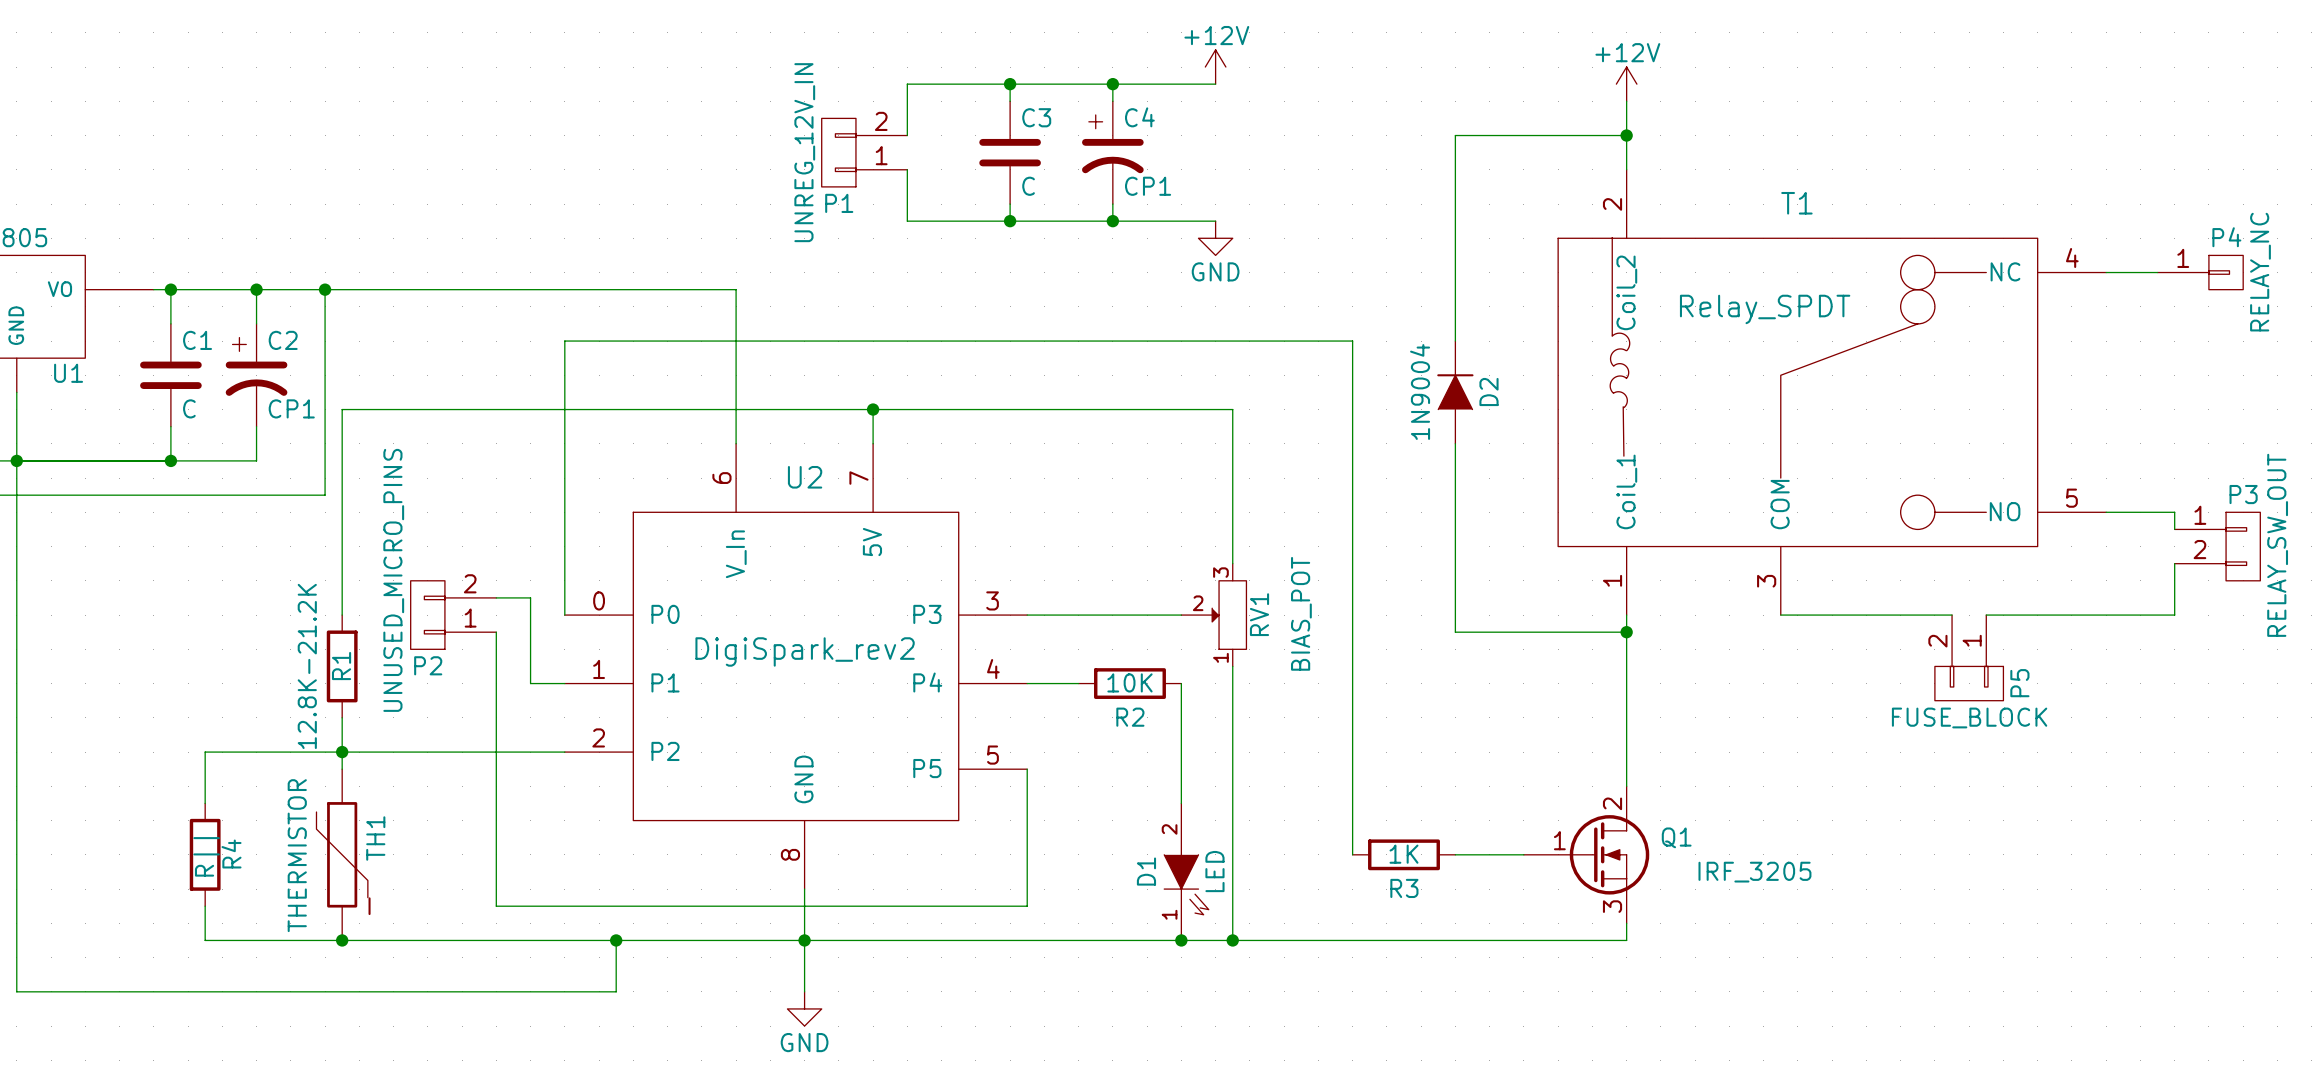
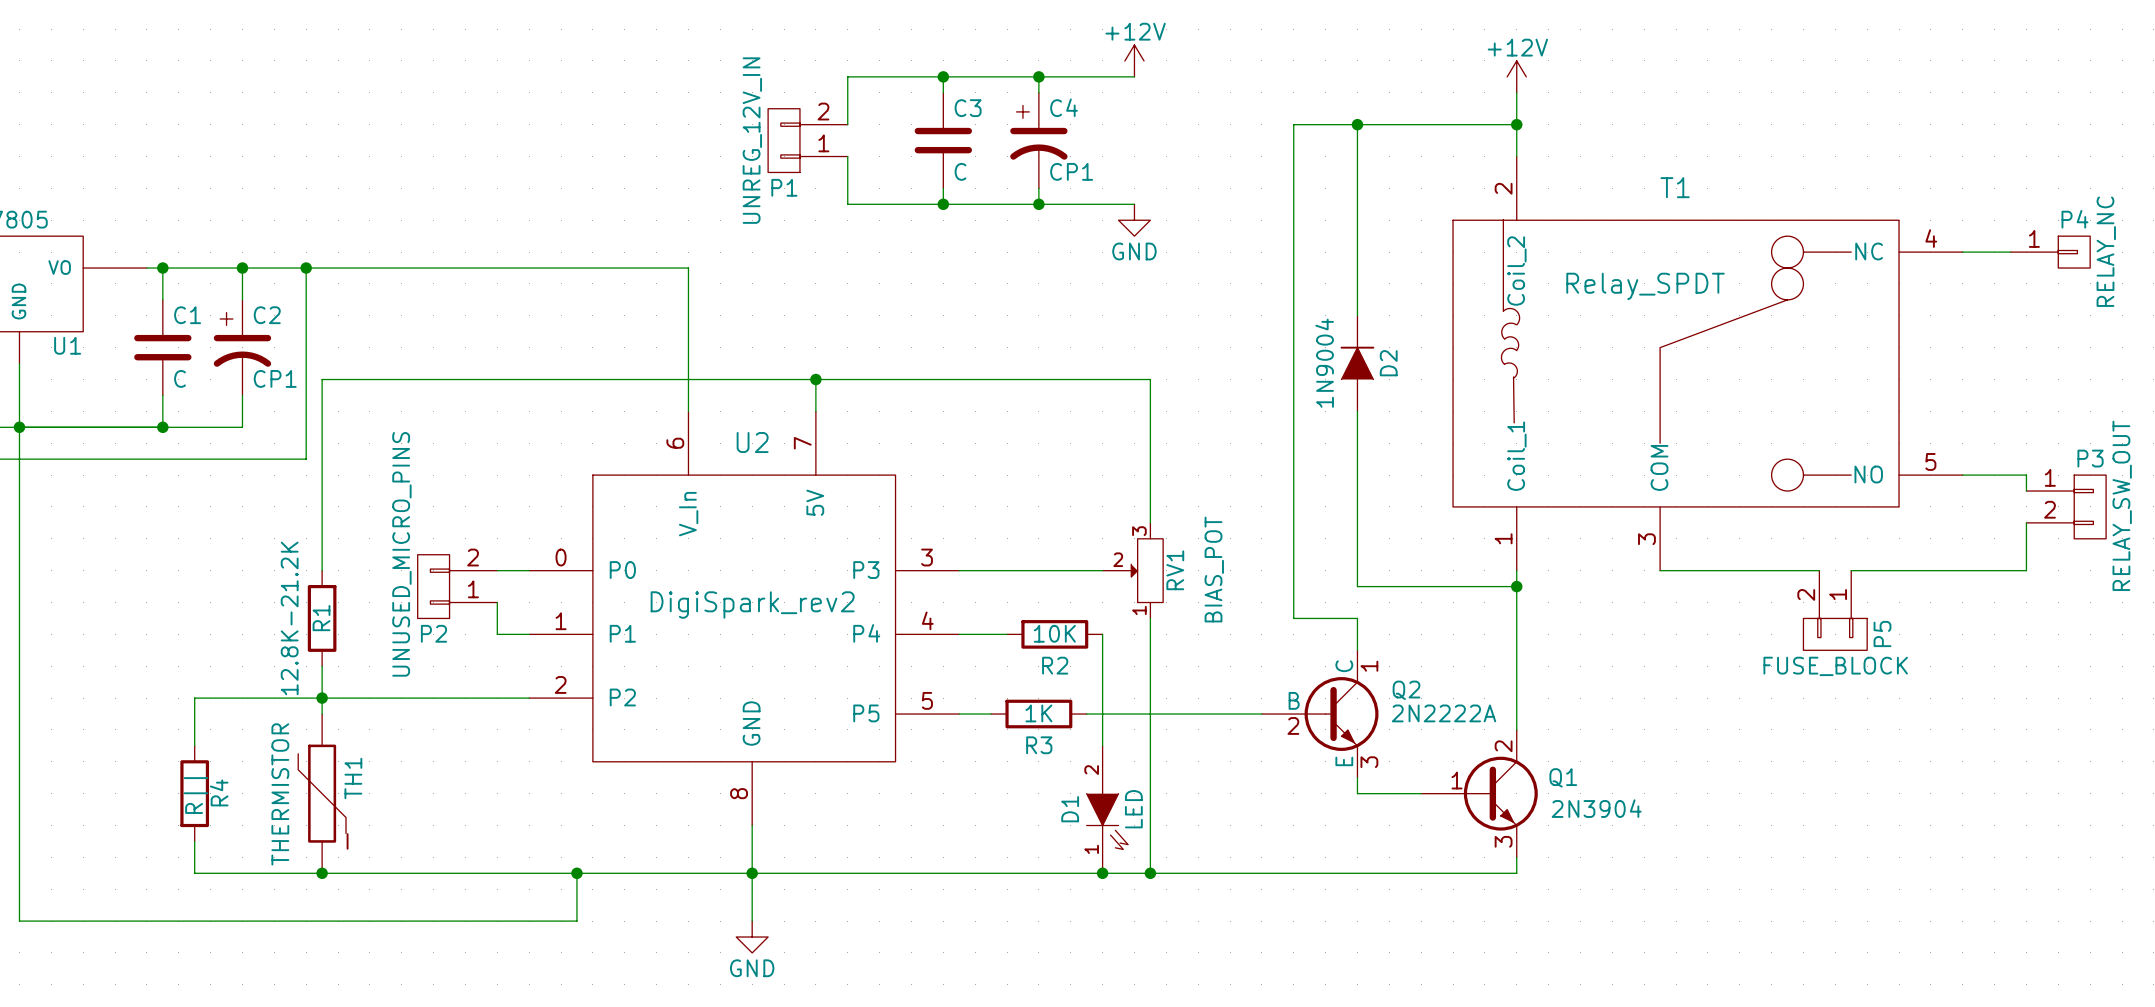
wire: none -> (1357, 124) (1293, 124) (1293, 618) (1357, 618) (1357, 650)
junction: none -> (1357, 124)
wire: (496, 597) (530, 597) (530, 649) -> none
P2 position: (453, 615) -> (457, 586)
wire: (564, 615) (564, 341) (1352, 341) (1352, 854) -> (529, 570) (497, 570)
wire: (496, 632) (496, 906) (1027, 906) (1027, 769) -> (991, 714) (959, 714)
wire: none -> (1086, 714) (1261, 714)
Q2: none -> 2N2222A (1320, 714)
Q1 symbol: [1523, 786, 1650, 924] -> [1421, 729, 1538, 858]
wire: none -> (1357, 777) (1357, 793)
R3 position: (1404, 854) -> (1038, 714)
Q1 value: IRF_3205 (1754, 872) -> 2N3904 (1596, 808)

